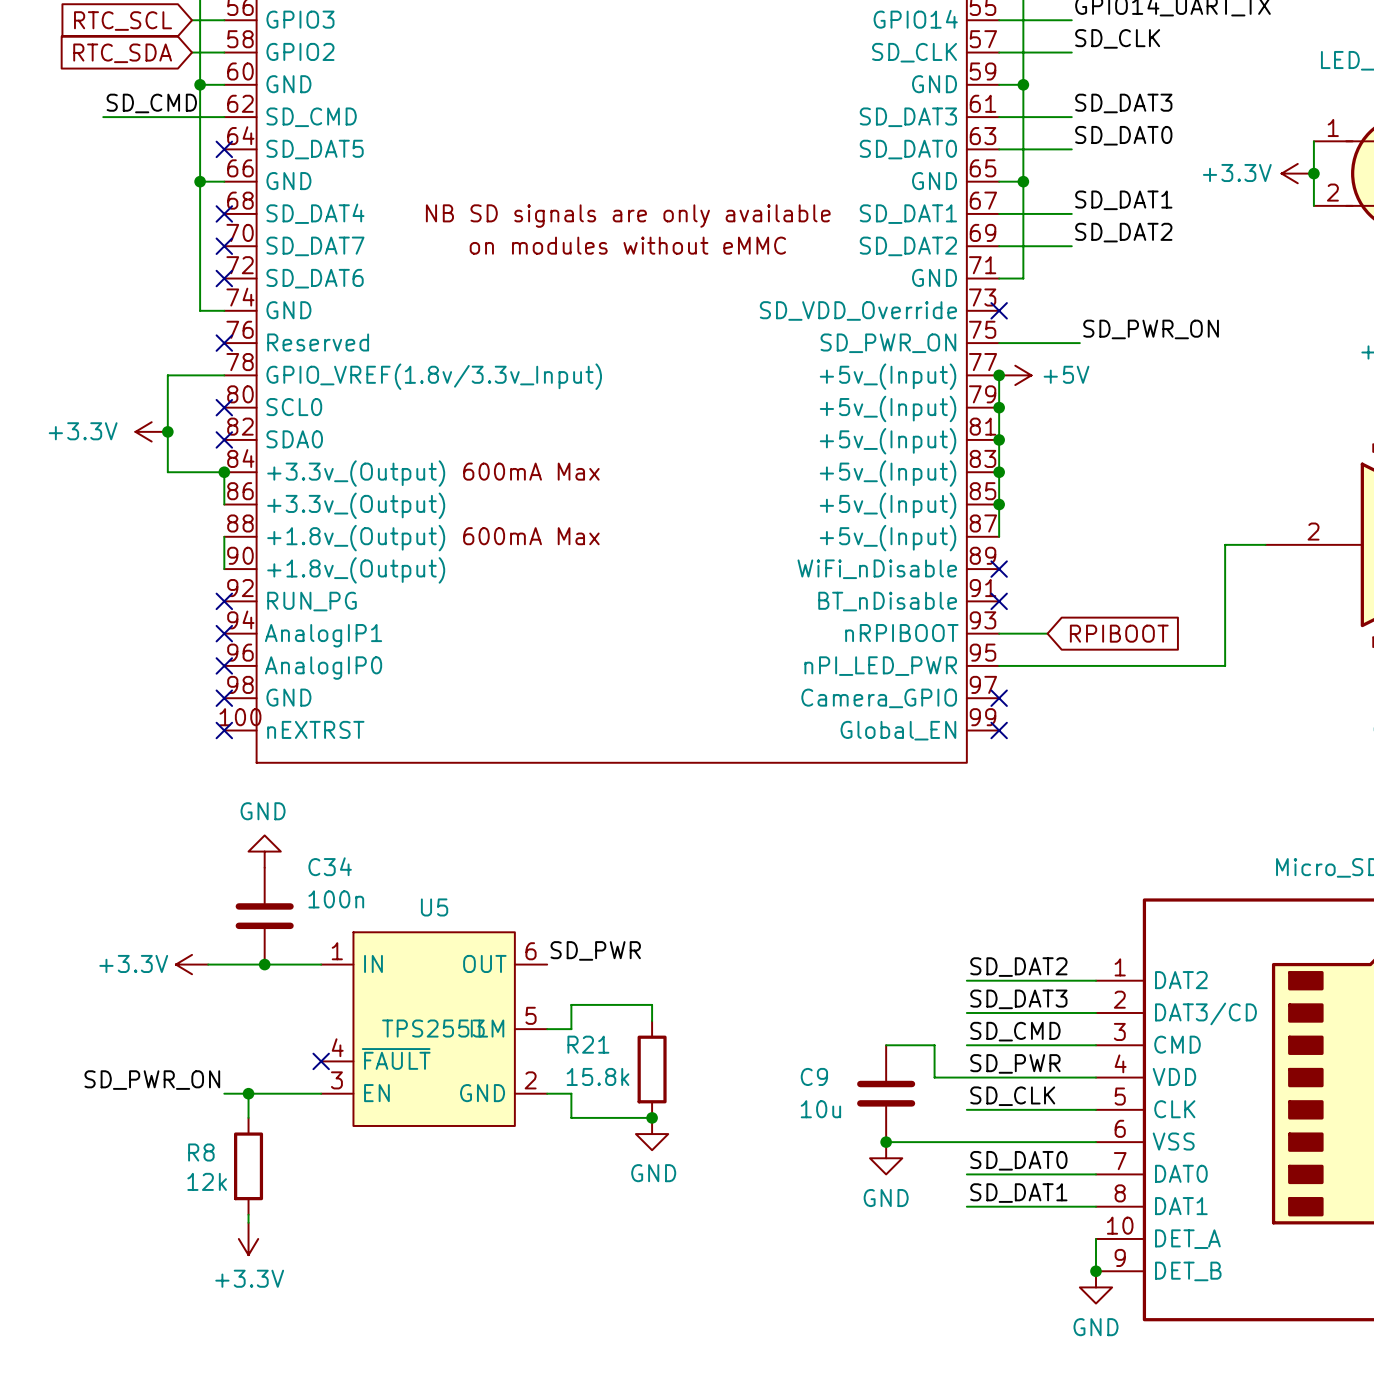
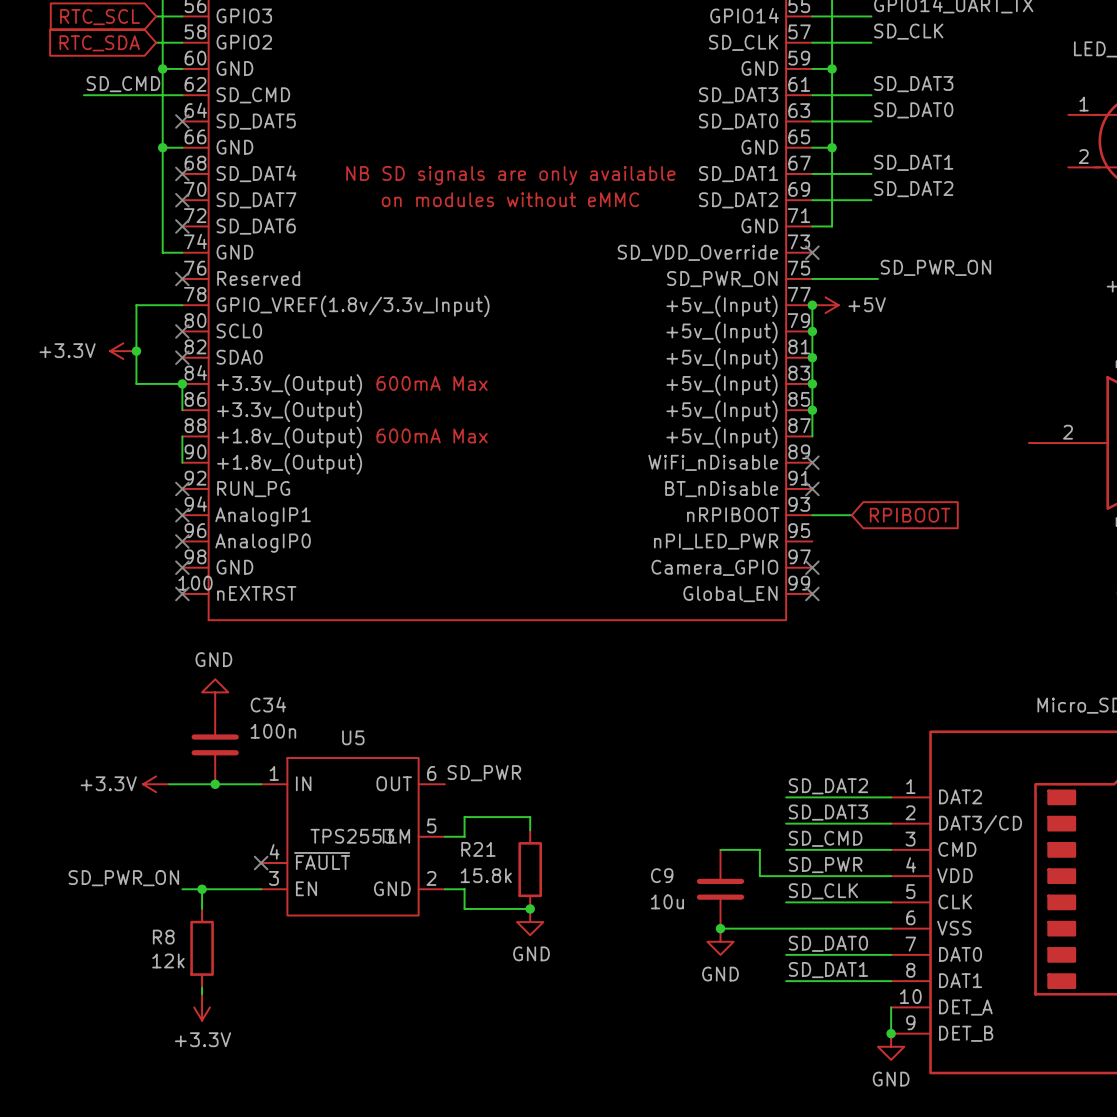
wire: (1313, 141) (1313, 205) -> none
power symbol: +3.3V (1297, 173) -> none
junction: (1313, 173) -> none
wire: (1265, 544) (1225, 544) (1225, 665) (999, 665) -> none

